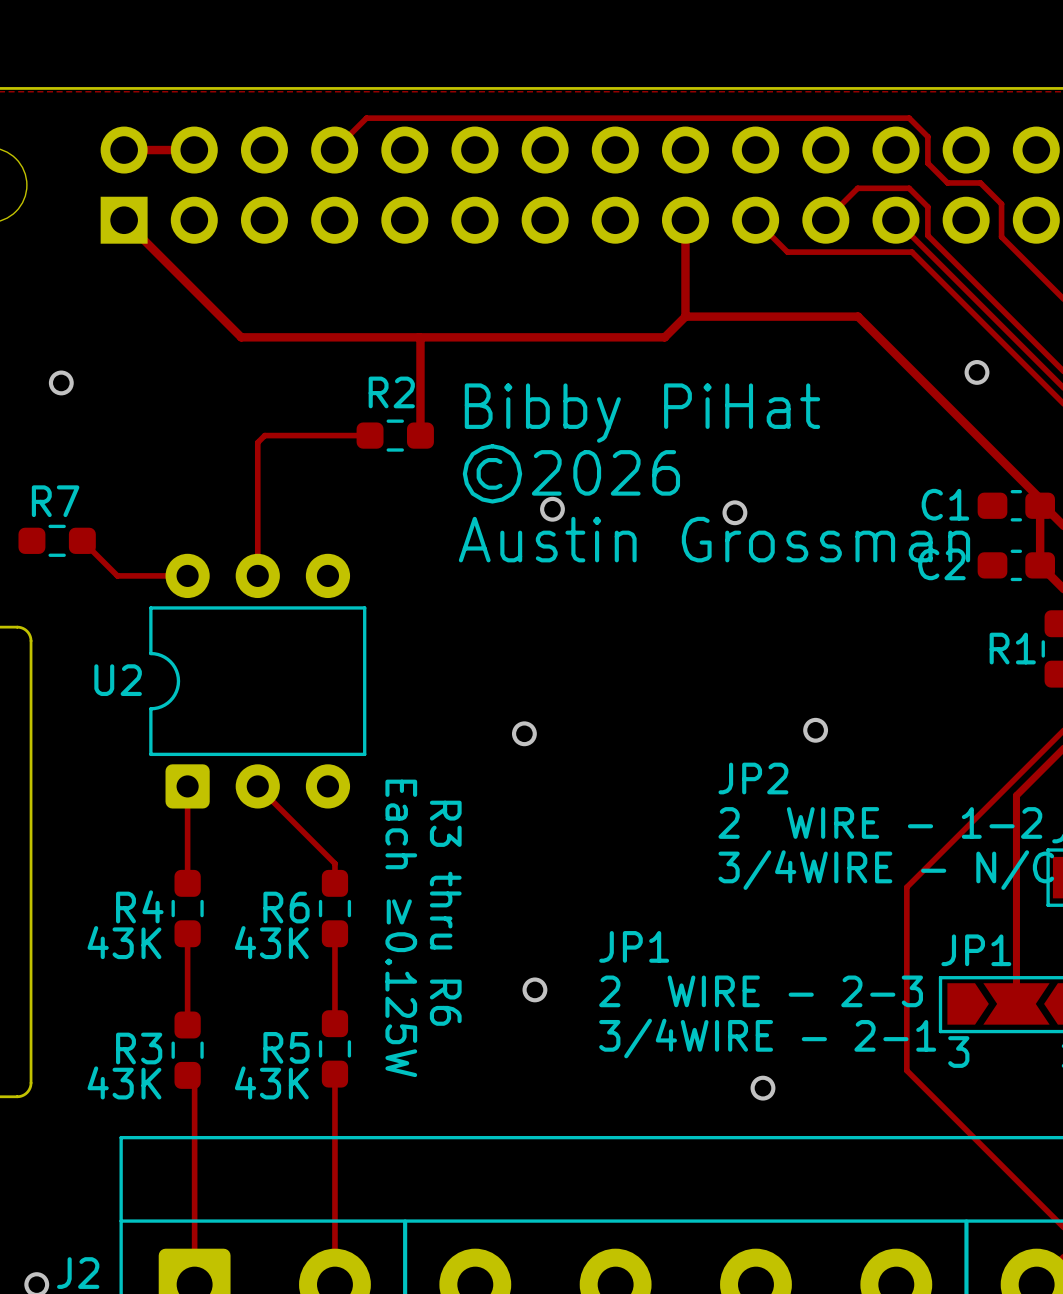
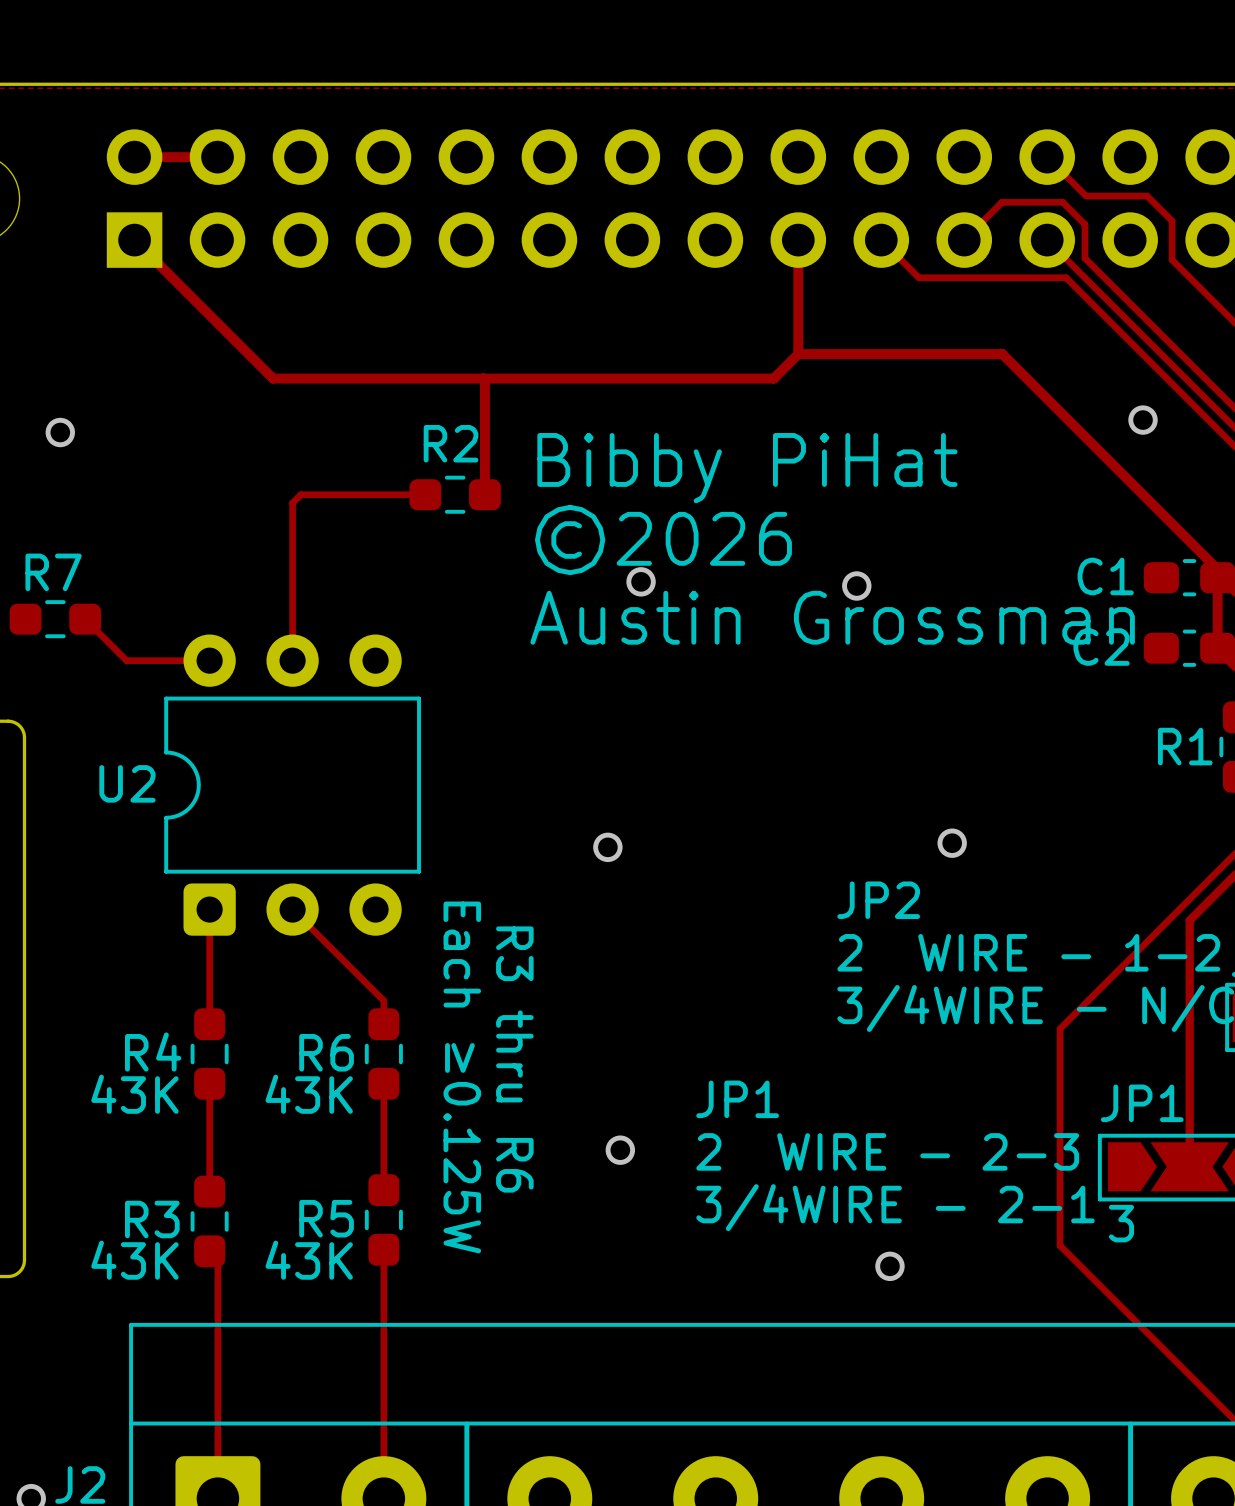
track: (334, 150) (366, 118) (909, 118) (927, 136) (927, 163) (947, 182) -> (1047, 157) (1086, 196) (1108, 196)

